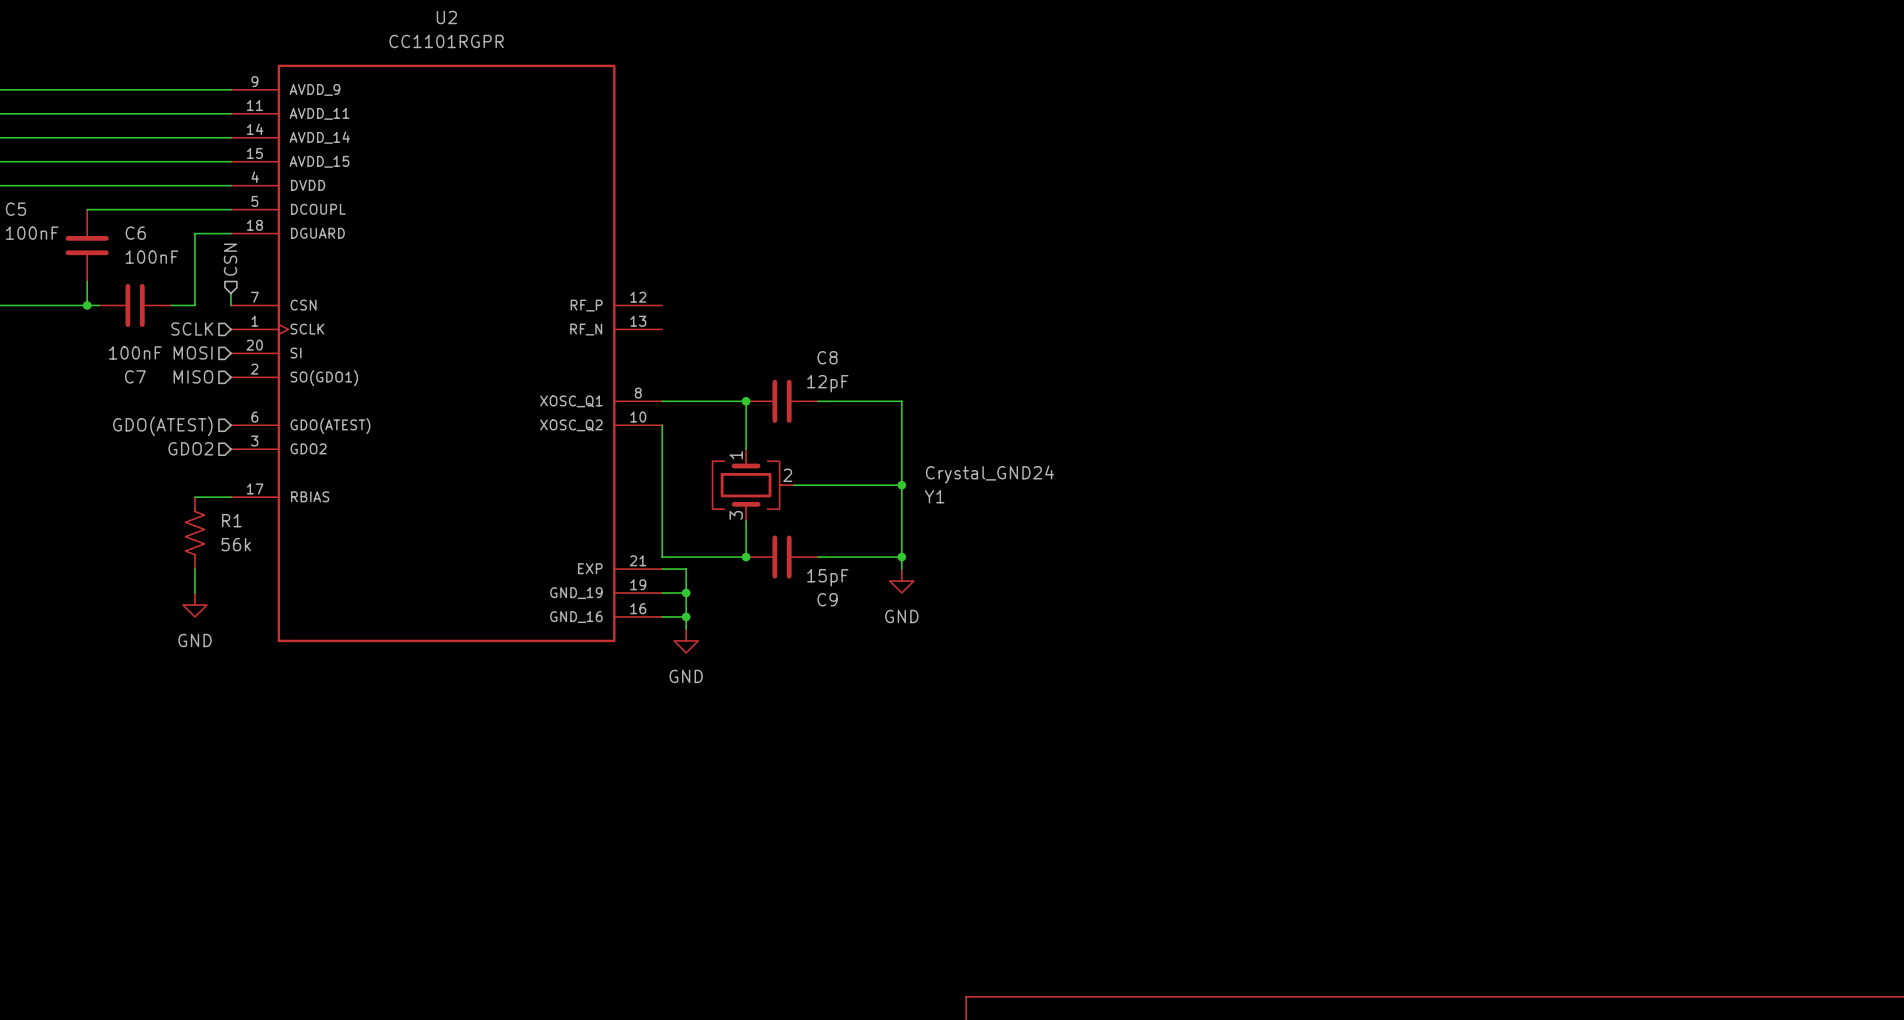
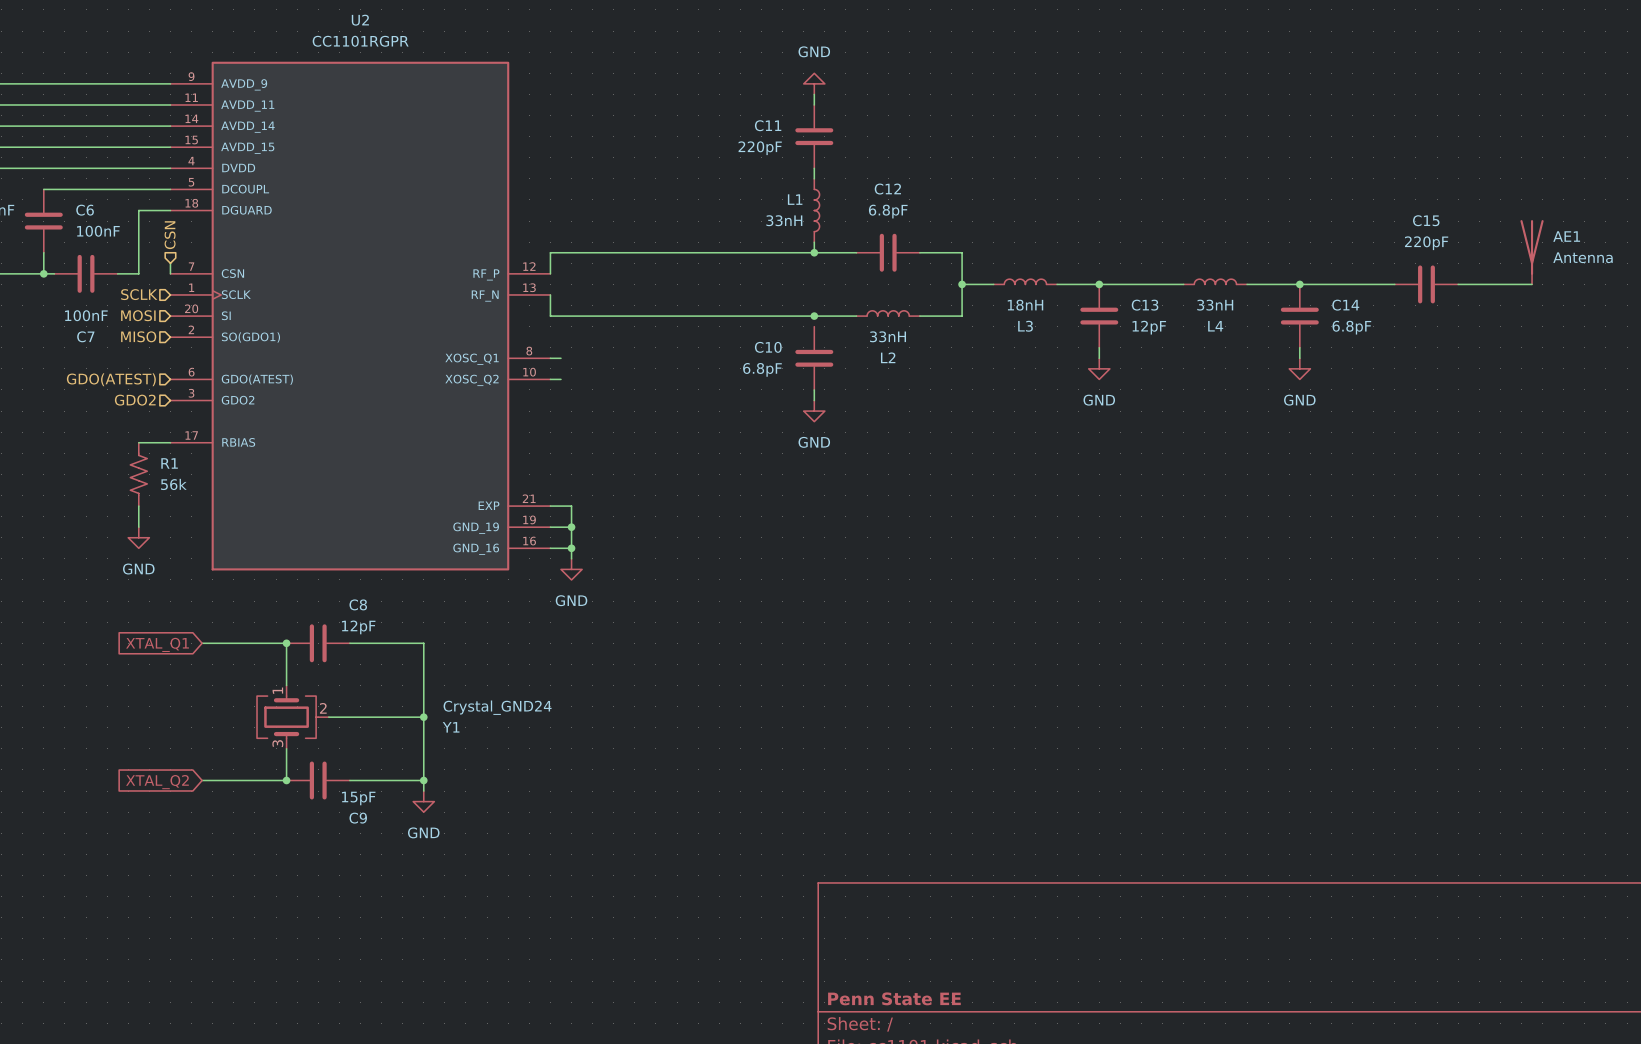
power symbol: none -> GND (814, 83)
wire: none -> (814, 94) (814, 104)
C11: none -> 220pF (814, 136)
wire: none -> (814, 168) (814, 178)
L1: none -> 33nH (816, 210)
wire: none -> (814, 242) (814, 252)
AE1: none -> Antenna (1532, 252)
junction: none -> (814, 252)
wire: none -> (856, 252) (550, 252) (550, 273)
C12: none -> 6.8pF (888, 252)
wire: none -> (919, 252) (962, 252) (962, 316) (919, 316)
L3: none -> 18nH (1025, 281)
L4: none -> 33nH (1215, 281)
wire: none -> (962, 284) (993, 284)
junction: none -> (962, 284)
wire: none -> (1057, 284) (1183, 284)
junction: none -> (1099, 284)
wire: none -> (1247, 284) (1394, 284)
junction: none -> (1299, 284)
C15: none -> 220pF (1426, 284)
wire: none -> (1458, 284) (1532, 284)
wire: none -> (550, 294) (550, 316) (856, 316)
L2: none -> 33nH (888, 313)
junction: none -> (814, 316)
C13: none -> 12pF (1099, 316)
C14: none -> 6.8pF (1299, 316)
wire: none -> (1099, 347) (1099, 358)
wire: none -> (1299, 347) (1299, 358)
wire: (674, 401) (746, 401) (746, 449) -> none
junction: (746, 401) -> none
C8 position: (782, 401) -> (318, 643)
wire: (817, 401) (901, 401) (901, 569) -> none
C10: none -> 6.8pF (814, 358)
power symbol: none -> GND (1099, 368)
power symbol: none -> GND (1299, 368)
wire: (662, 425) (662, 557) (746, 557) (746, 521) -> (550, 379) (560, 379)
wire: none -> (814, 389) (814, 400)
Y1 position: (753, 485) -> (292, 717)
wire: (794, 485) (901, 485) -> none
junction: (901, 485) -> none
junction: (746, 557) -> none
C9 position: (782, 557) -> (318, 780)
wire: (817, 557) (901, 557) -> none
junction: (901, 557) -> none
power symbol position: GND (901, 581) -> GND (814, 411)
wire: none -> (202, 643) (286, 643) (286, 685)
junction: none -> (286, 643)
wire: none -> (349, 643) (423, 643) (423, 791)
global label: none -> XTAL_Q1 (157, 644)
wire: none -> (328, 717) (423, 717)
junction: none -> (423, 717)
wire: none -> (286, 748) (286, 780) (202, 780)
junction: none -> (286, 780)
wire: none -> (349, 780) (423, 780)
junction: none -> (423, 780)
global label: none -> XTAL_Q2 (157, 782)
power symbol: none -> GND (423, 801)

